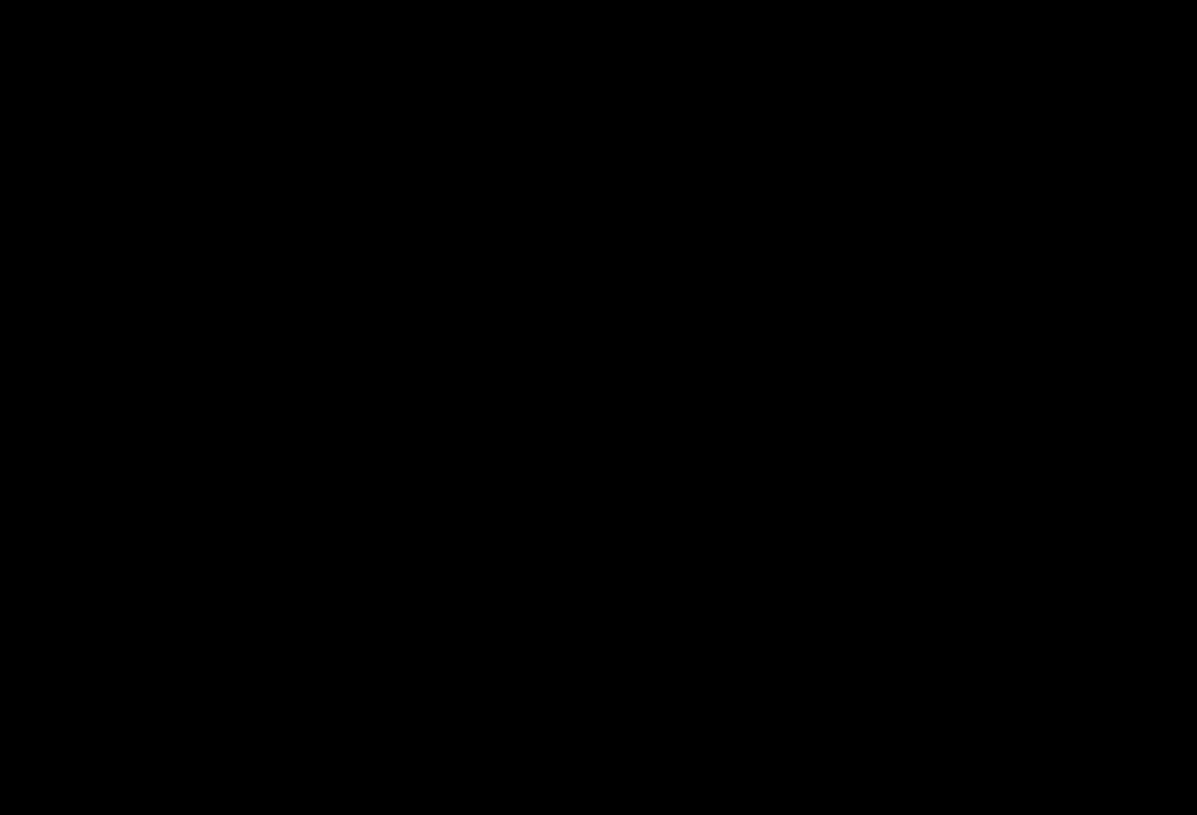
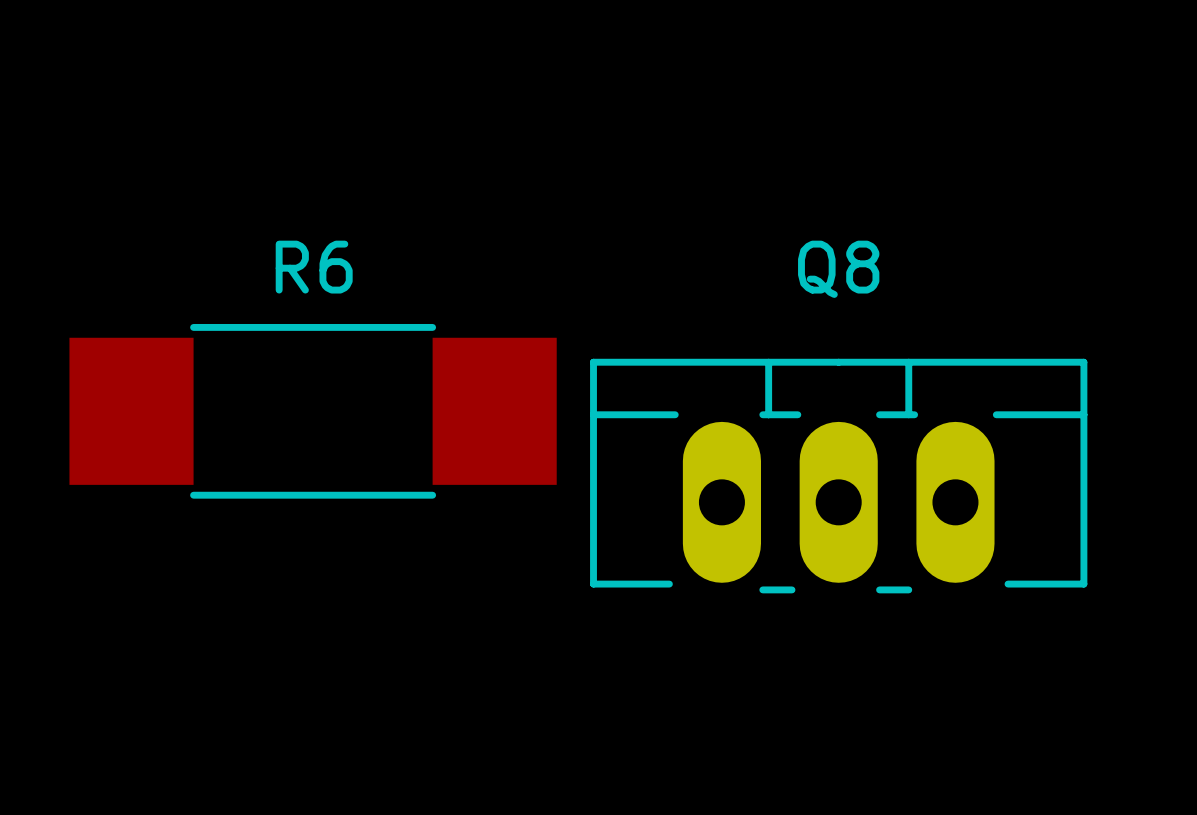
R6: none -> (313, 411)
Q8: none -> (838, 476)

